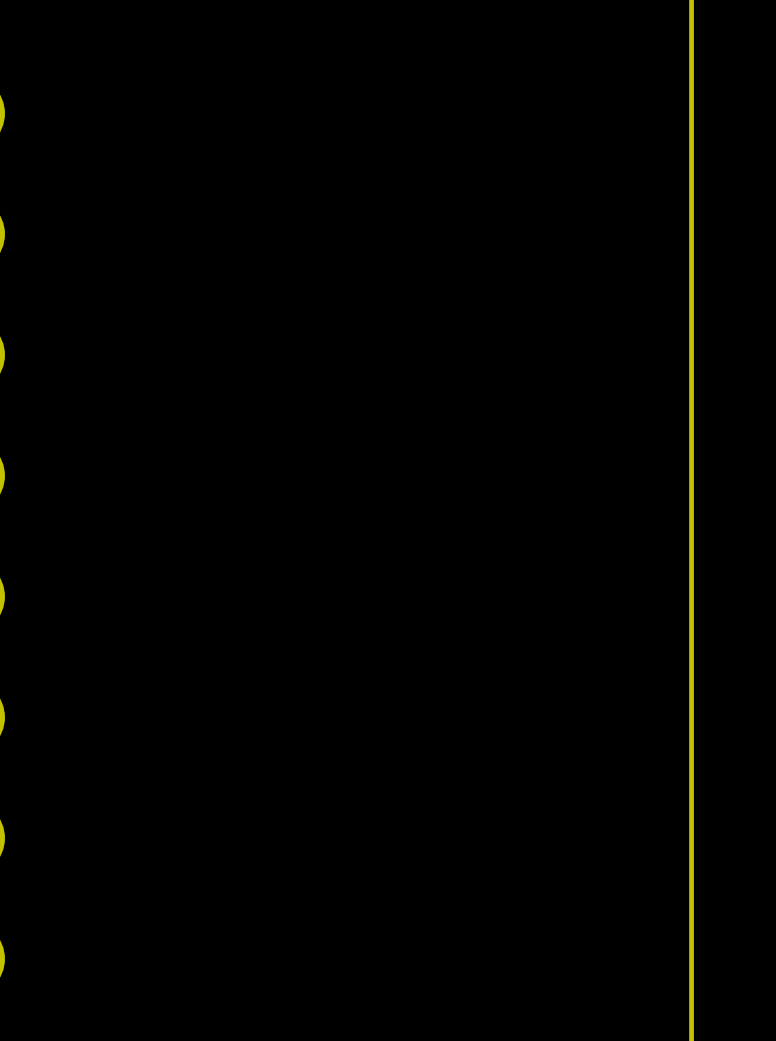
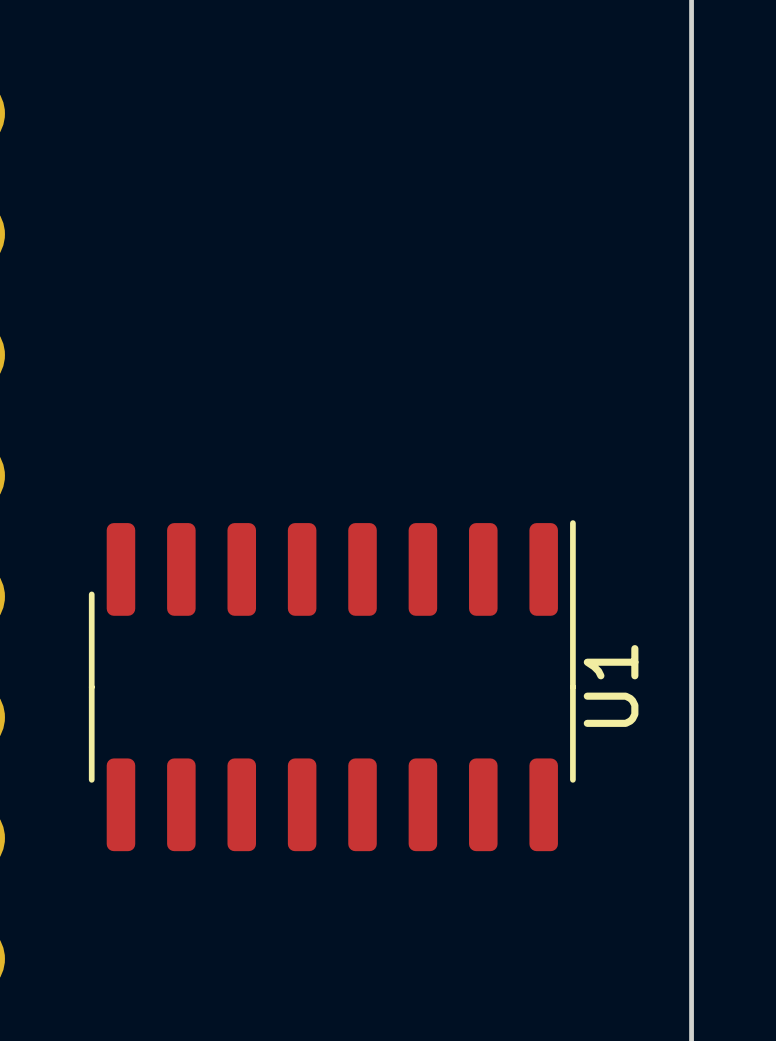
U1: none -> (332, 685)

